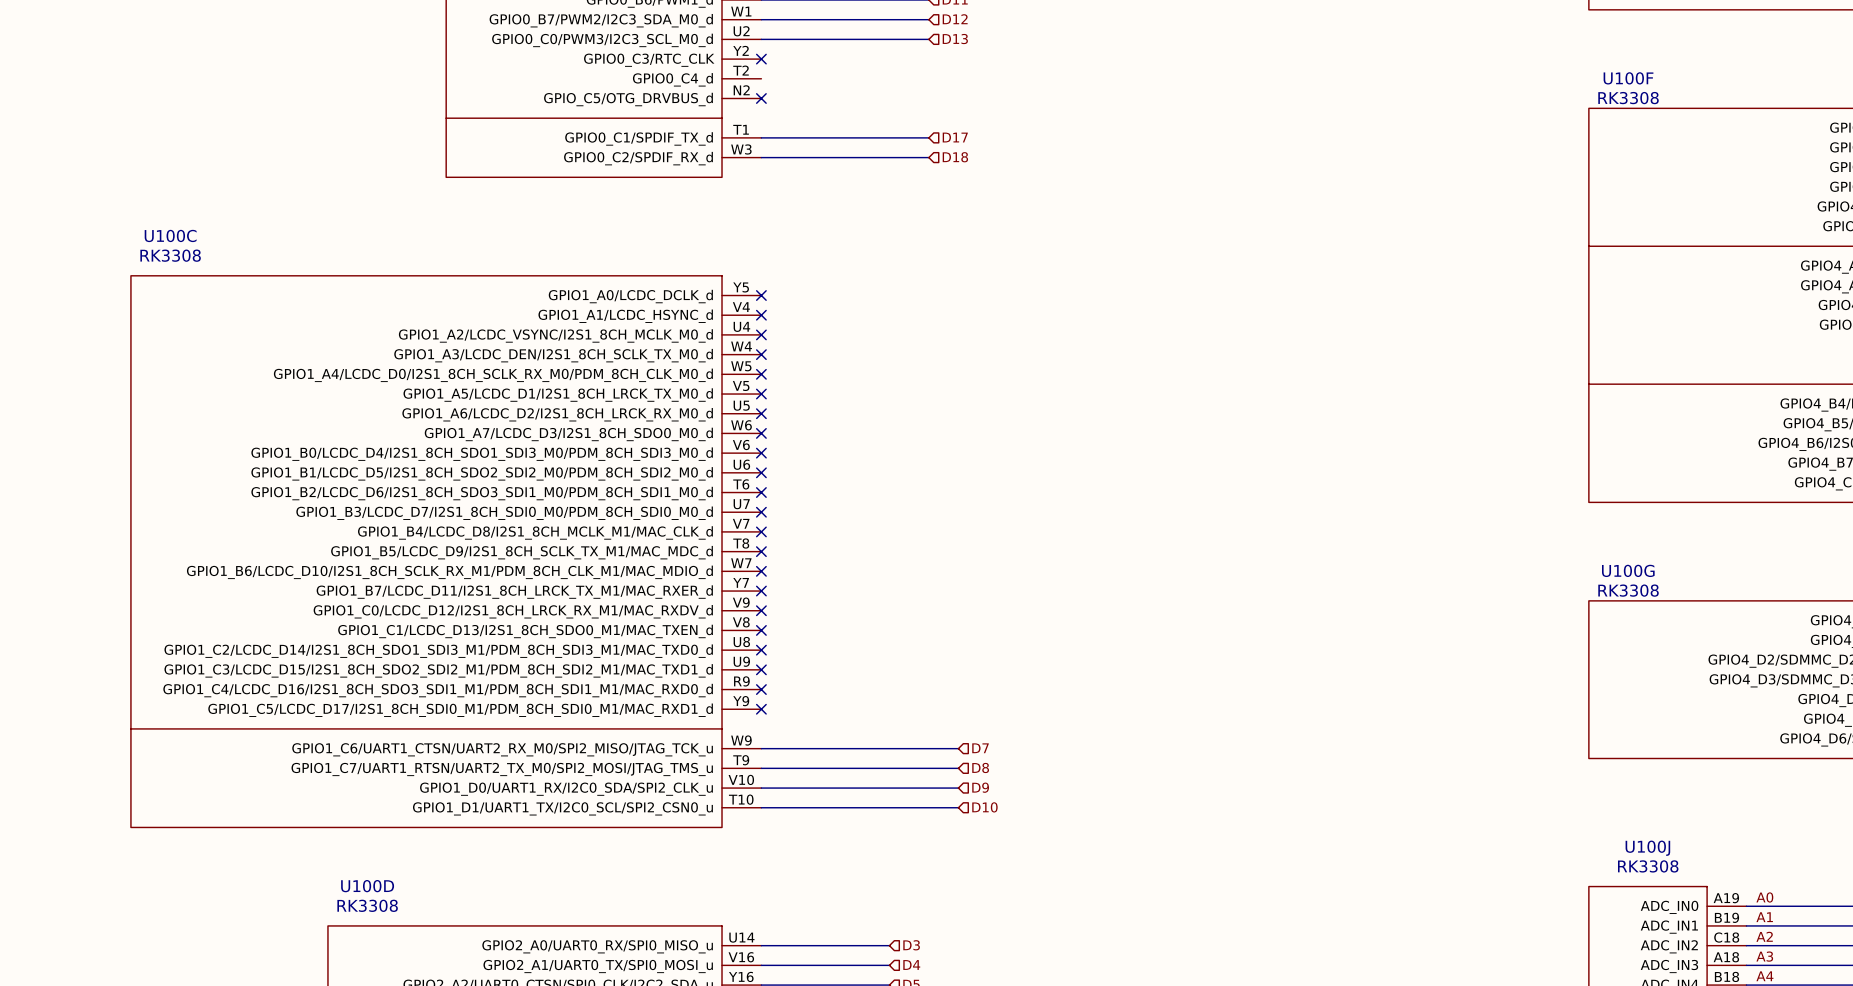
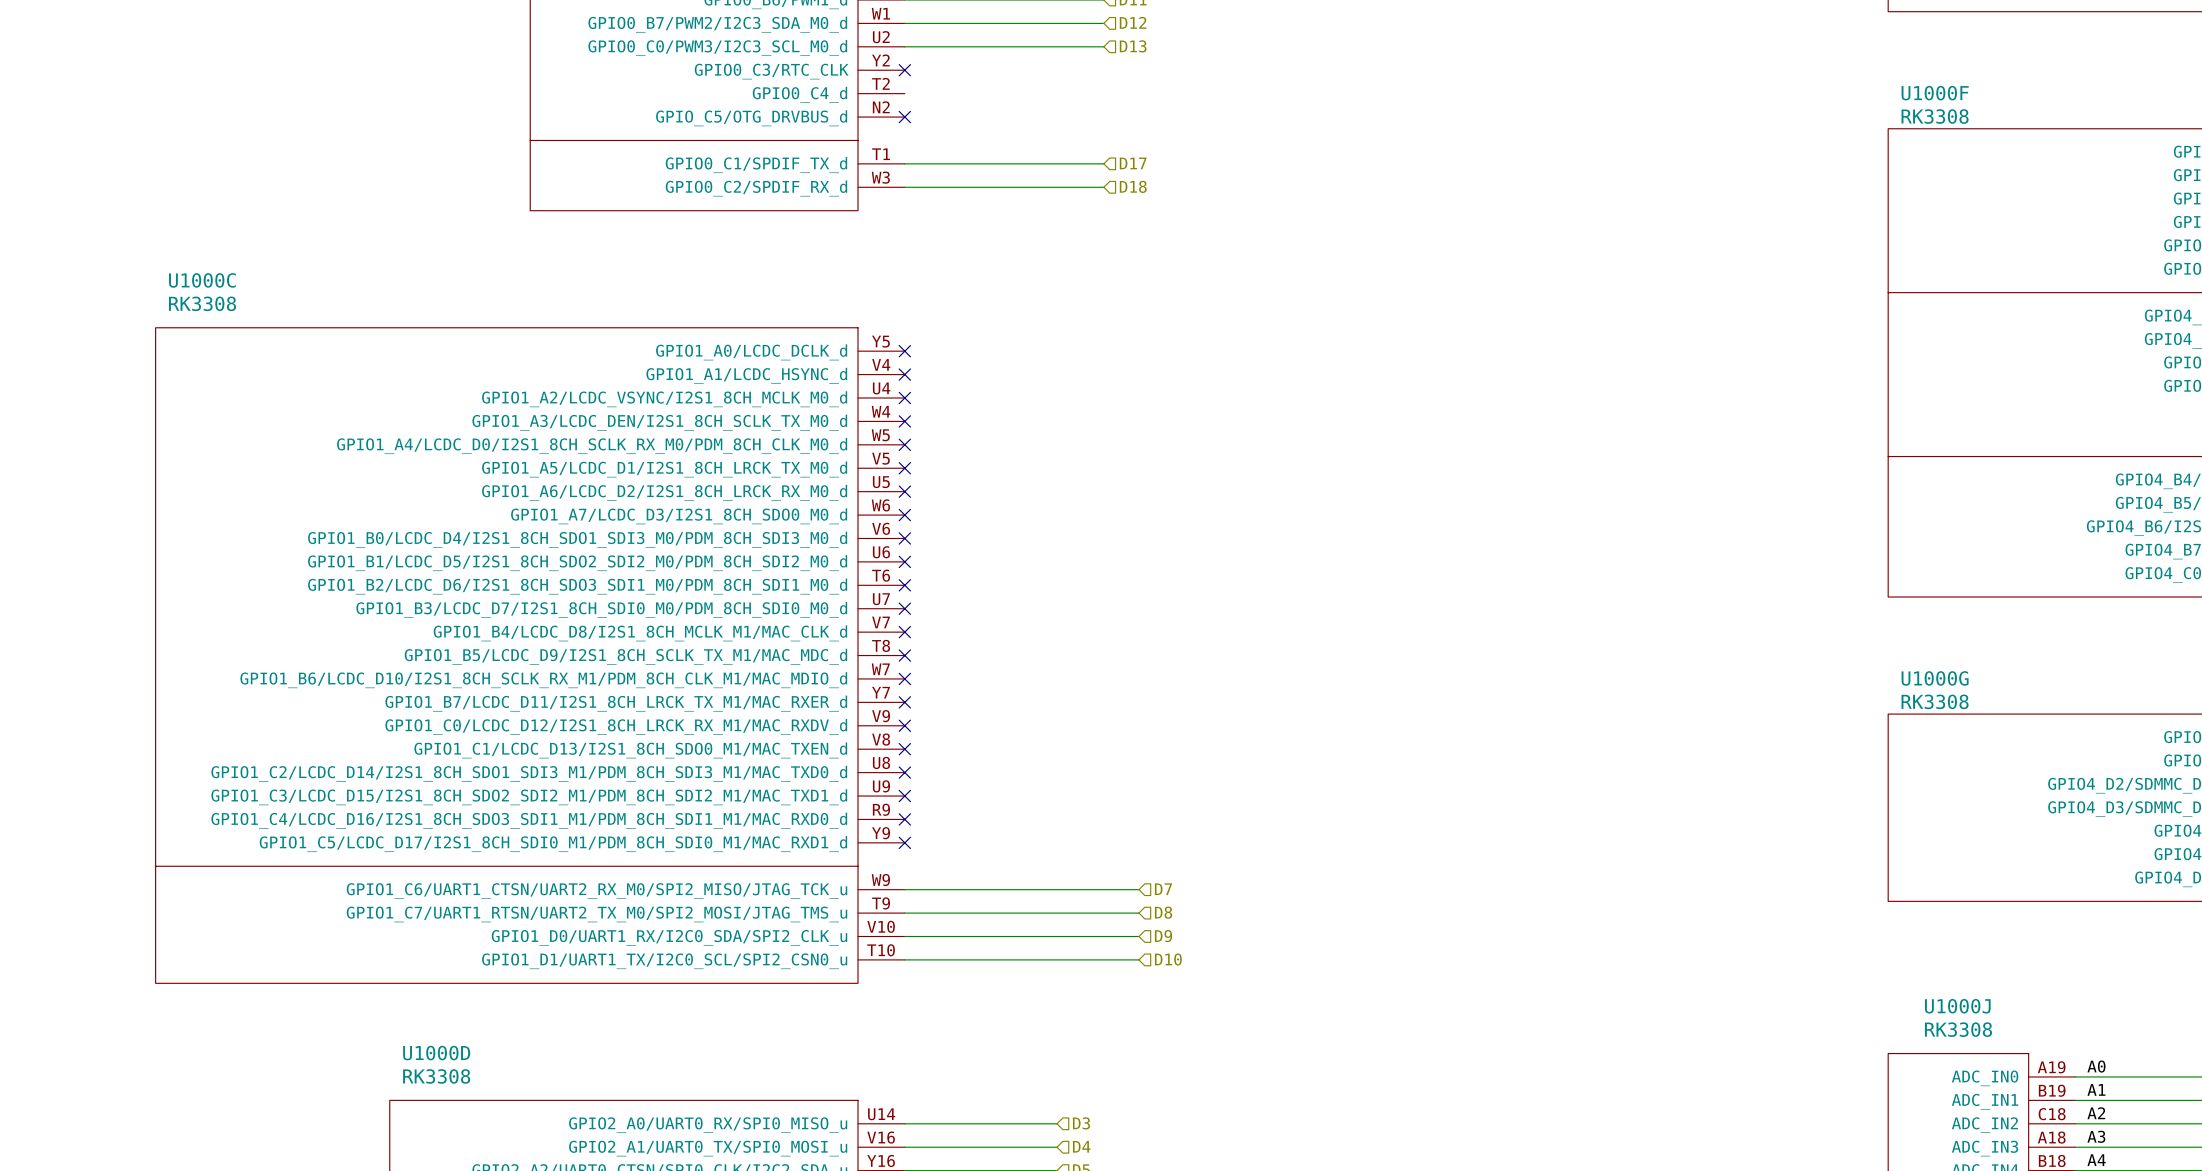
U100F name: U100F (1628, 78) -> U1000F (1935, 93)
U100C name: U100C (170, 235) -> U1000C (202, 280)
U100G name: U100G (1628, 570) -> U1000G (1935, 678)
U100J name: U100J (1647, 848) -> U1000J (1957, 1006)
U100D name: U100D (367, 886) -> U1000D (436, 1053)

